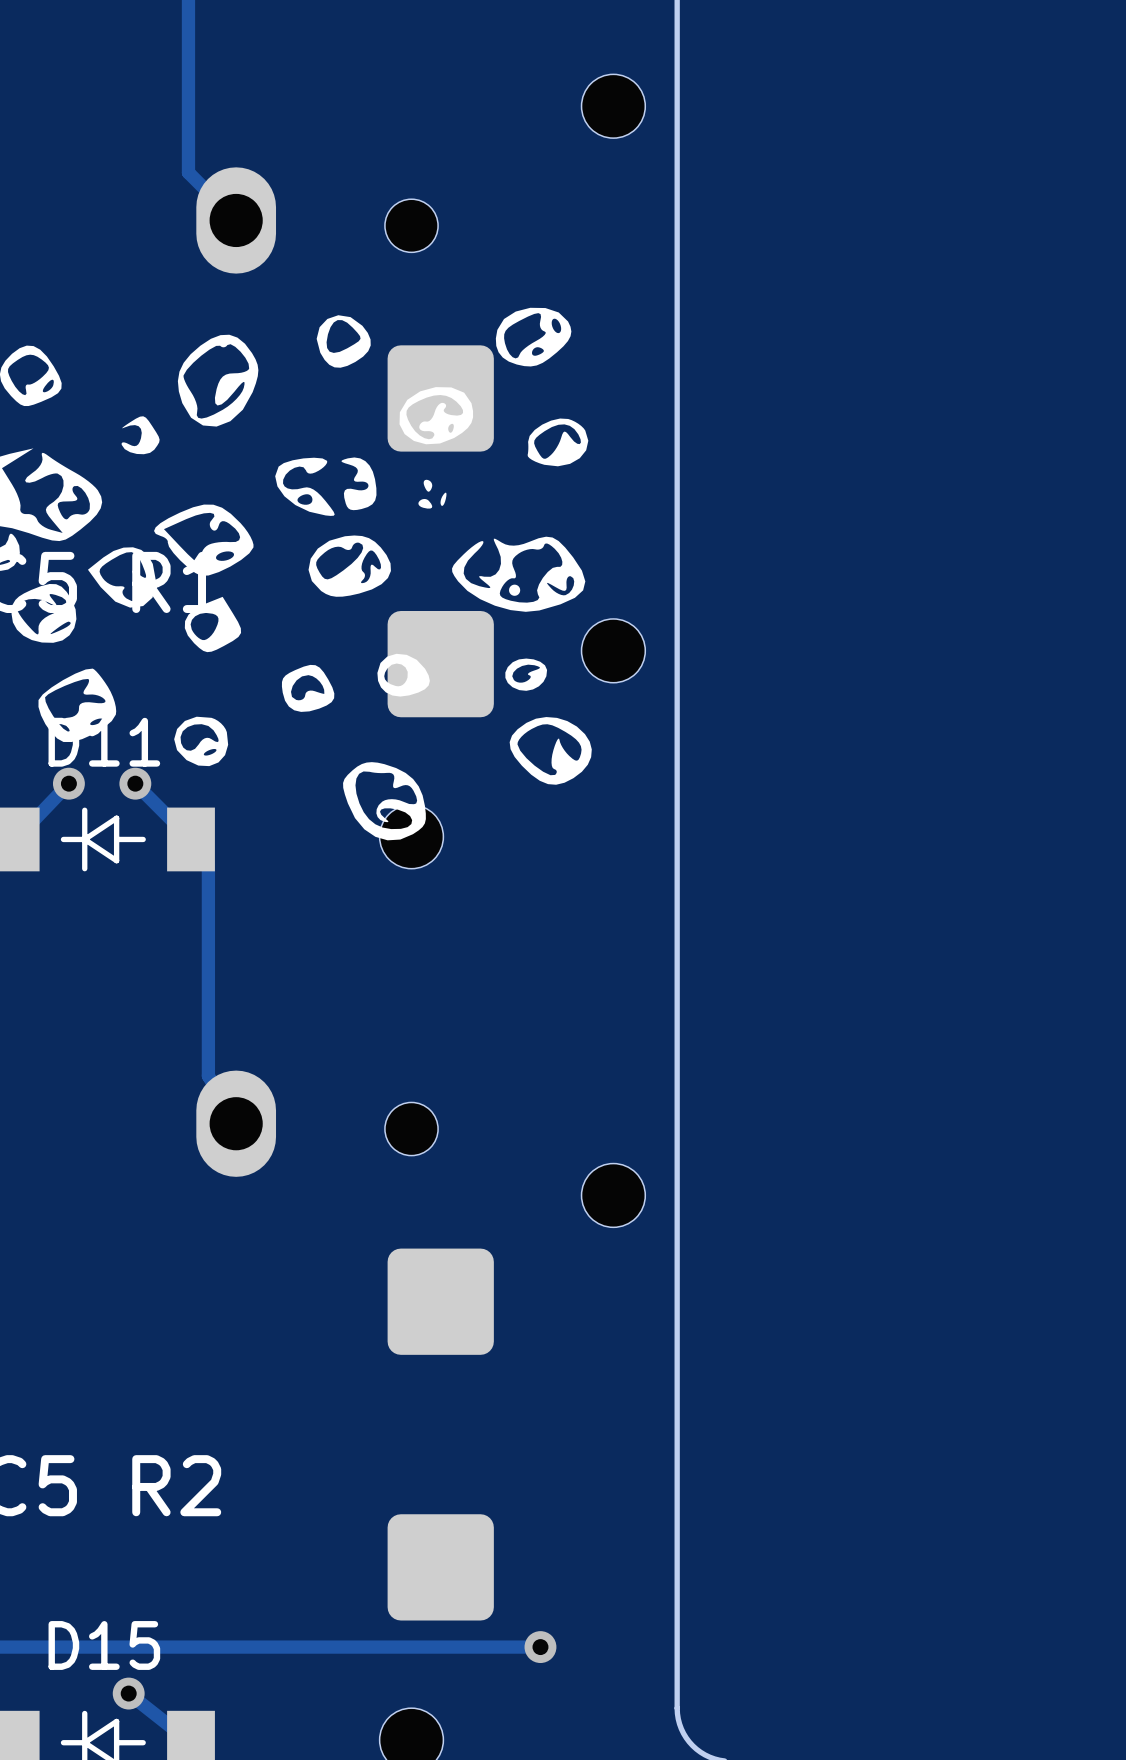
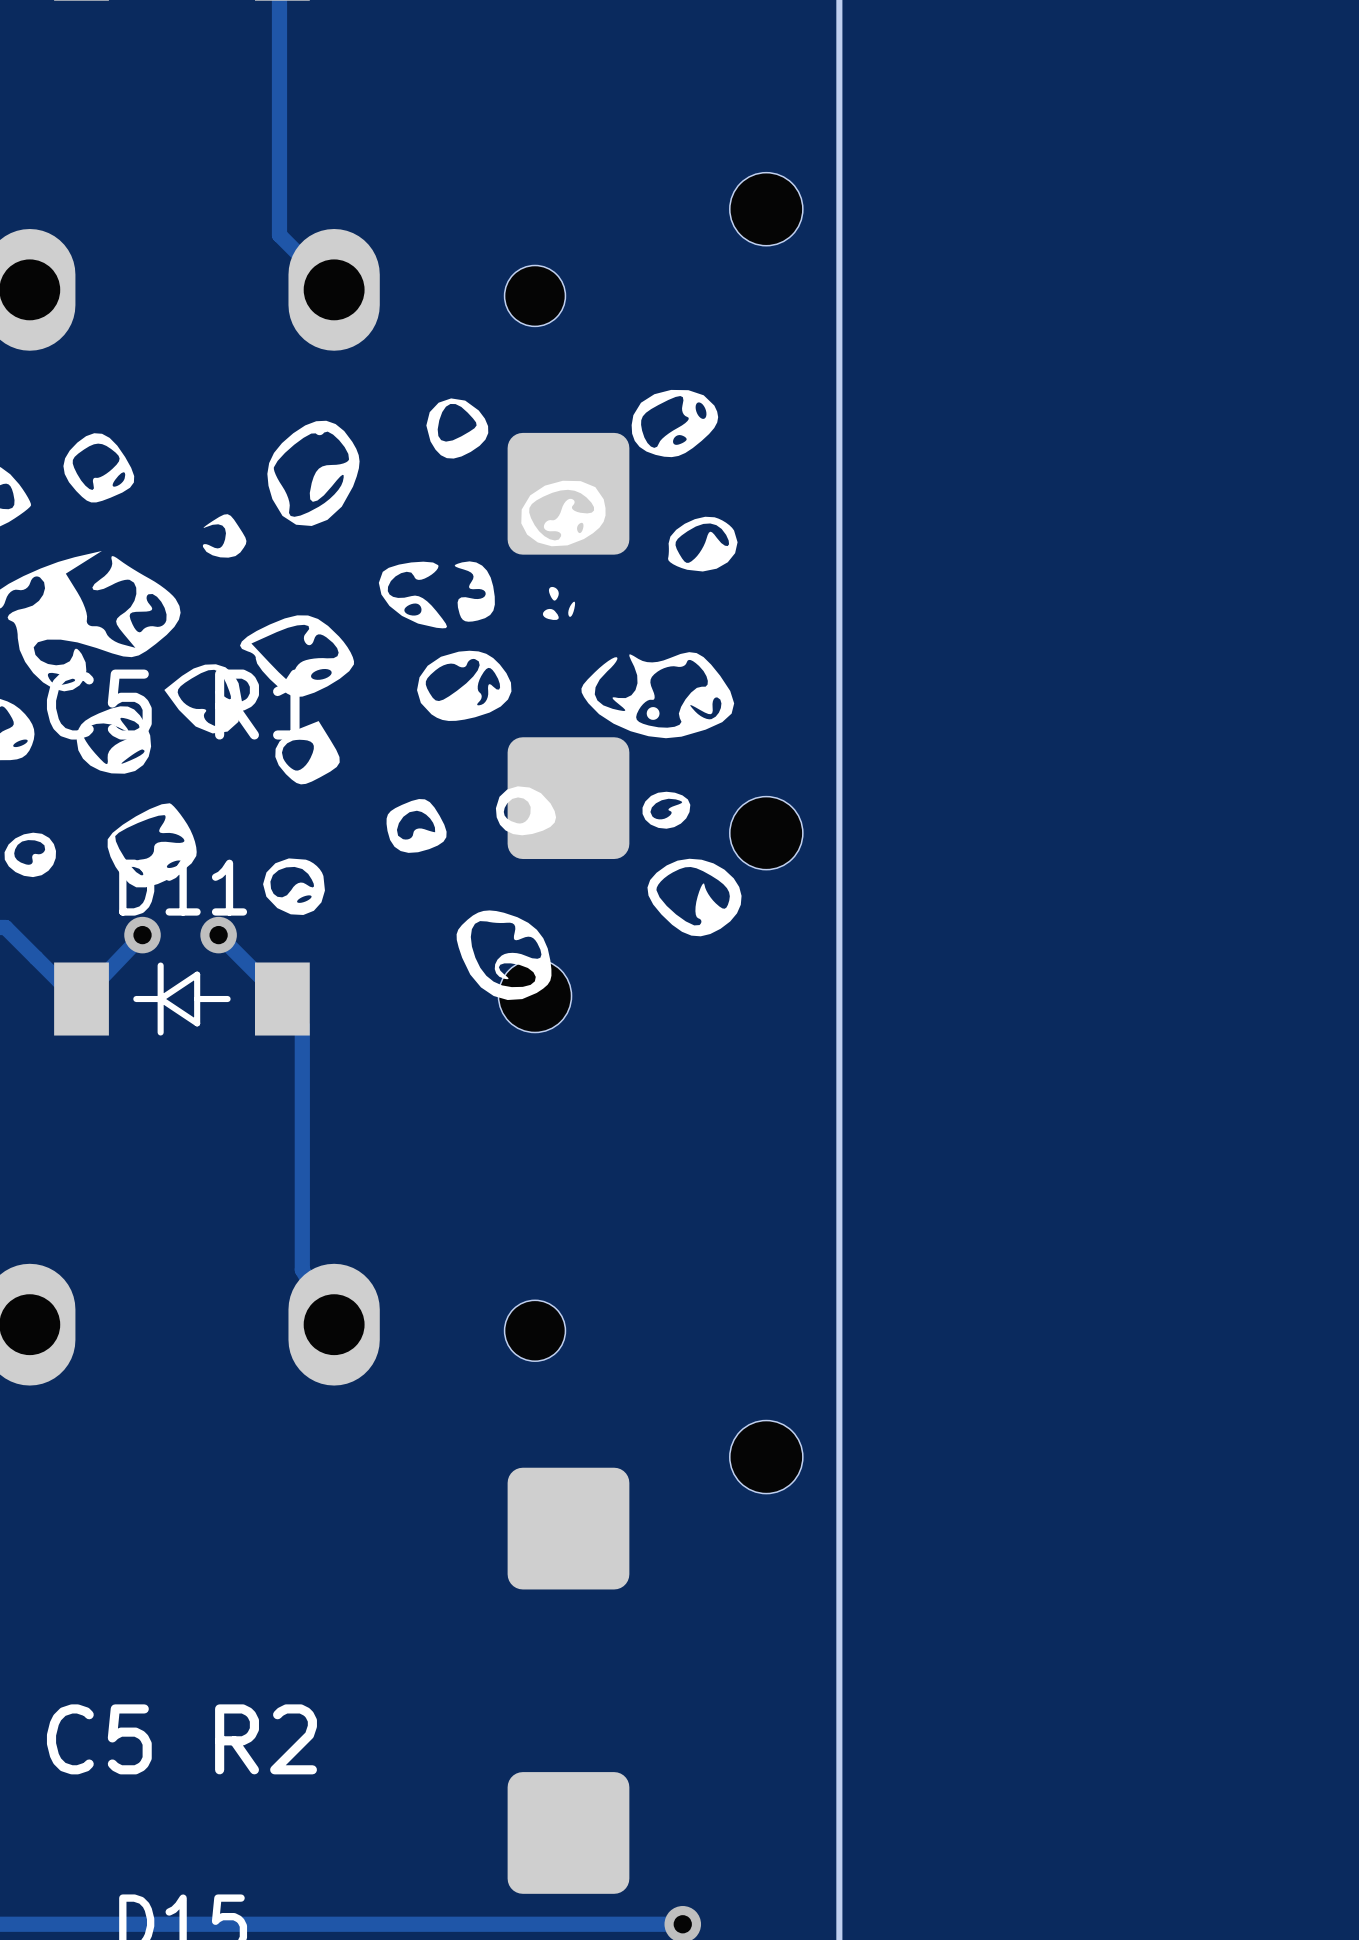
part position: (613, 106) -> (766, 209)
part position: (613, 650) -> (766, 833)
part position: (613, 1195) -> (766, 1457)

